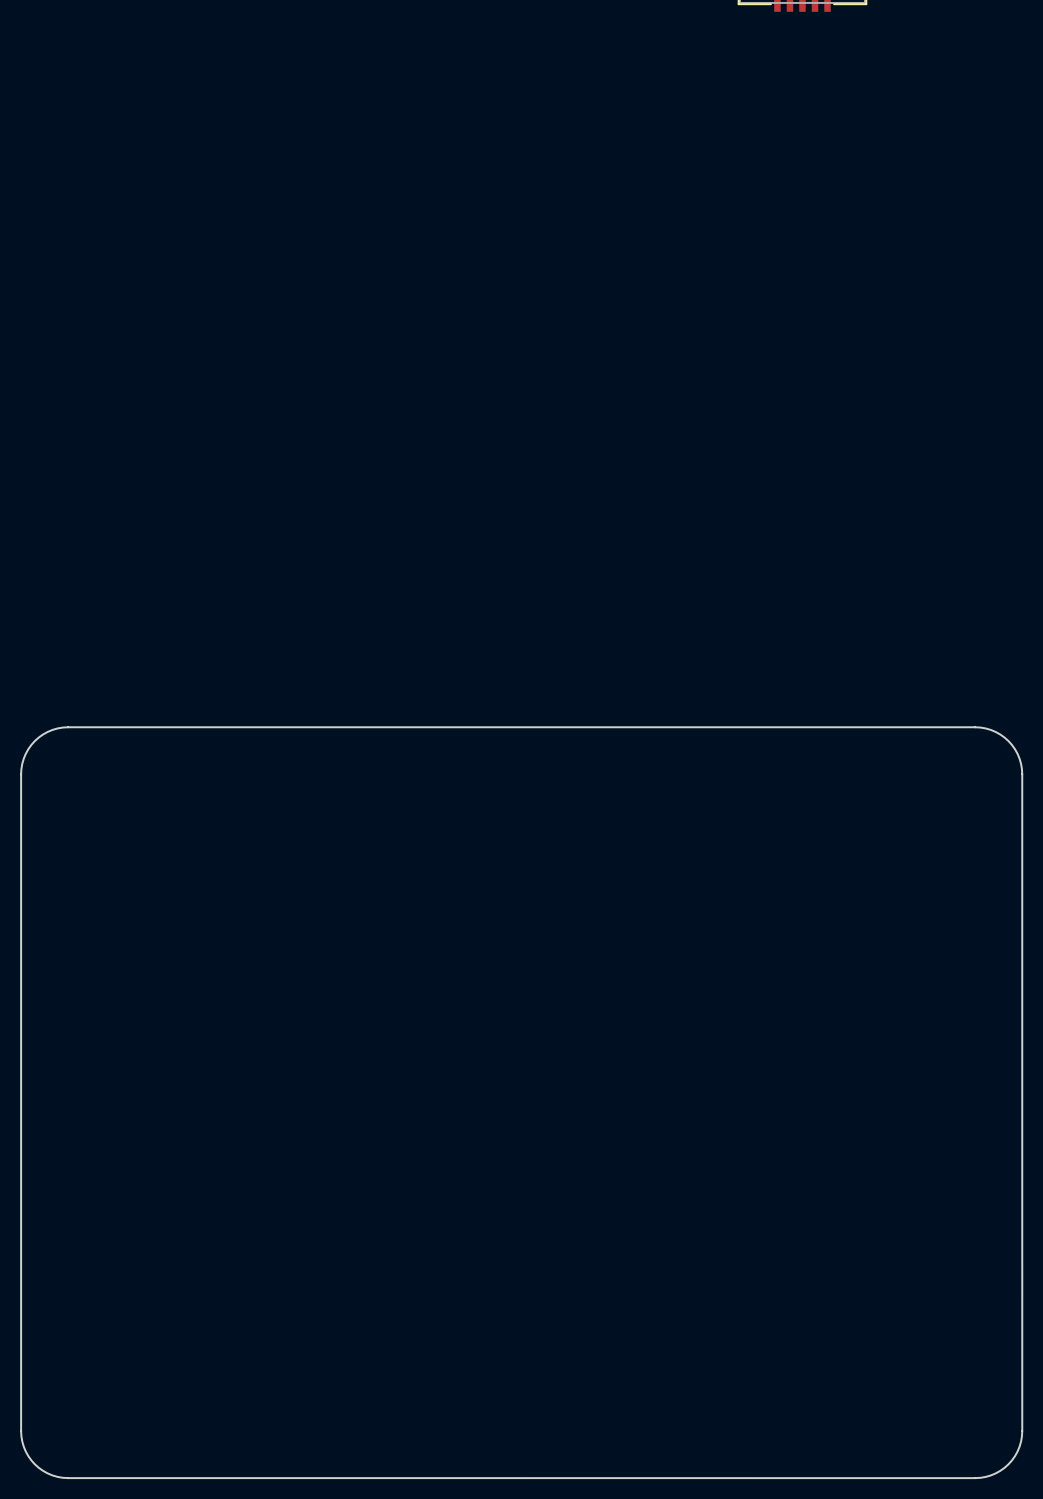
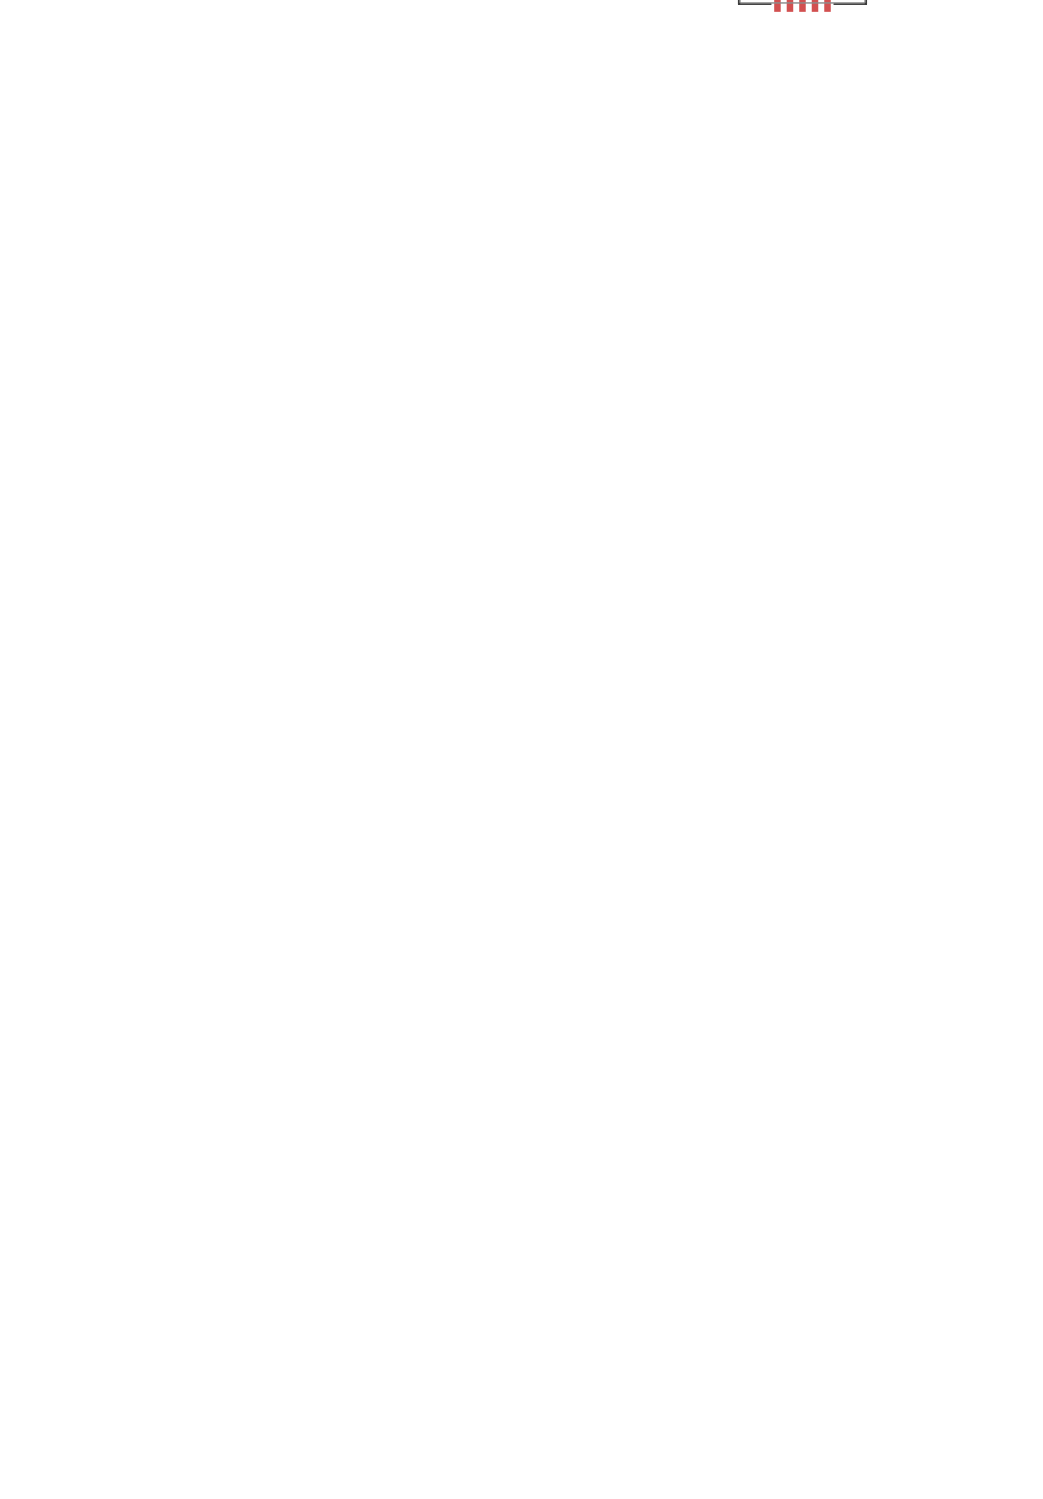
board edge: (68, 727) (975, 727) (990, 729) (1004, 737) (1017, 753) (1022, 774) (1022, 1431) (1019, 1446) (1011, 1460) (995, 1473) (975, 1478) (68, 1478) (52, 1475) (38, 1467) (25, 1451) (21, 1431) (21, 774) (23, 758) (34, 741) (52, 729) (68, 727) -> none

